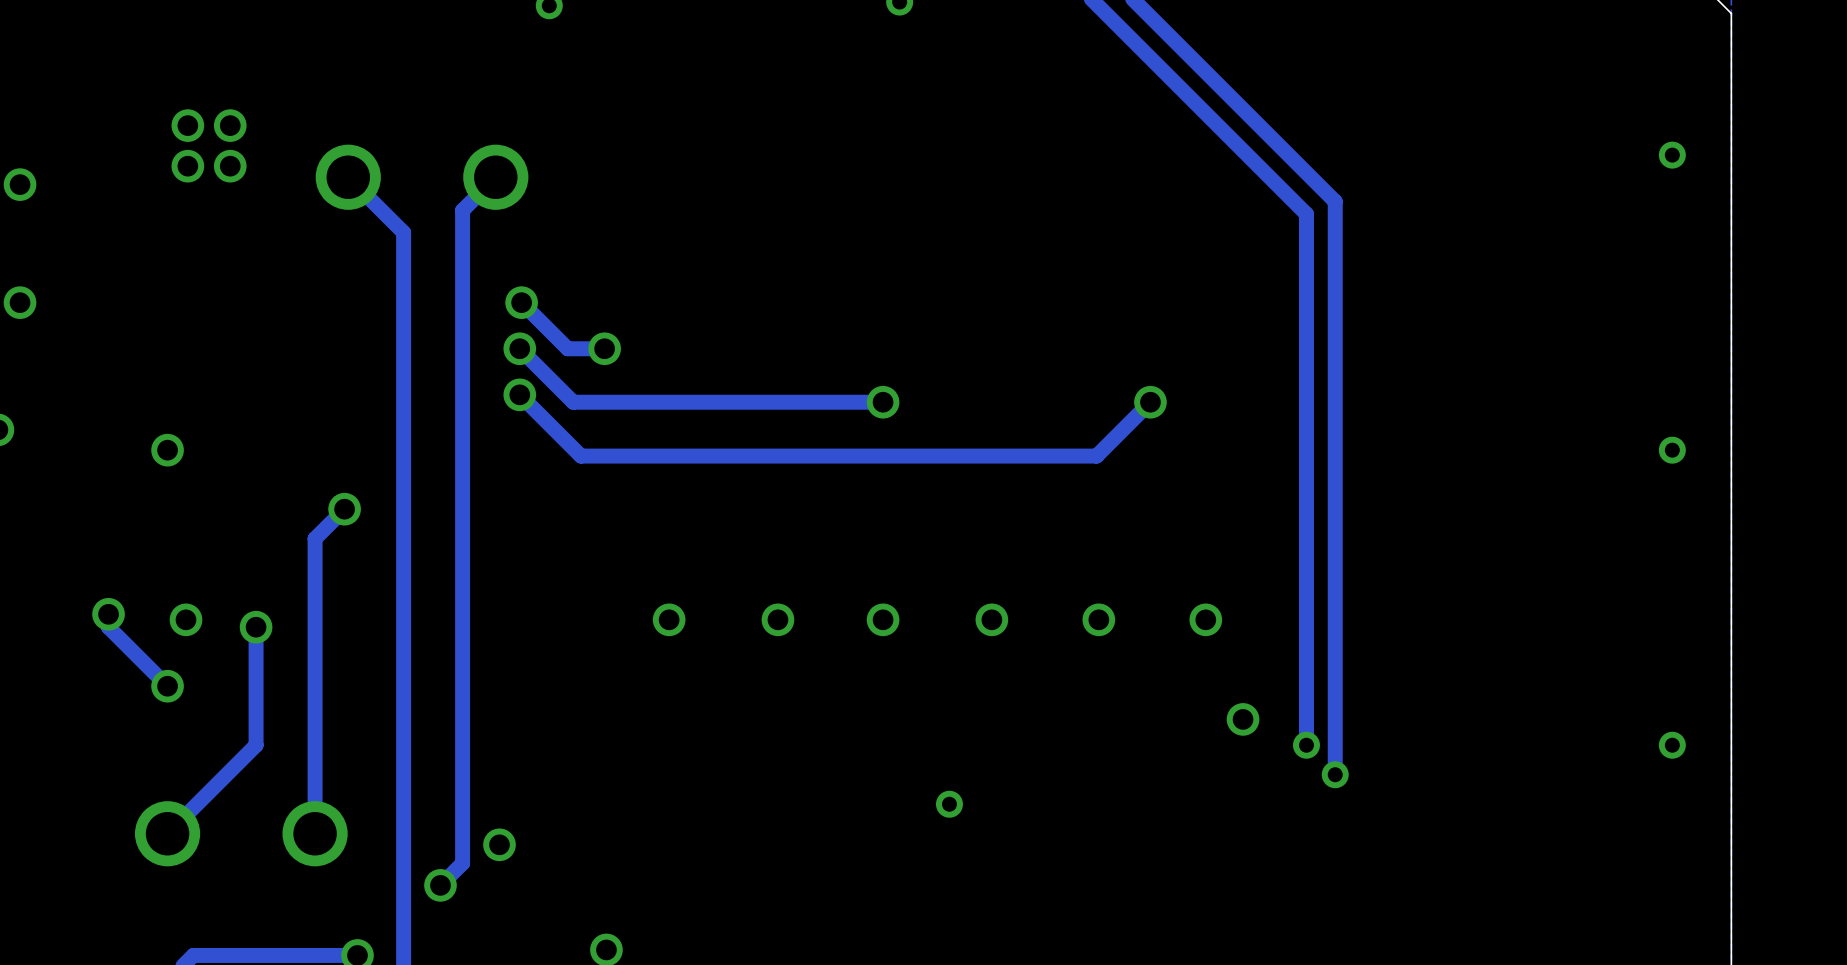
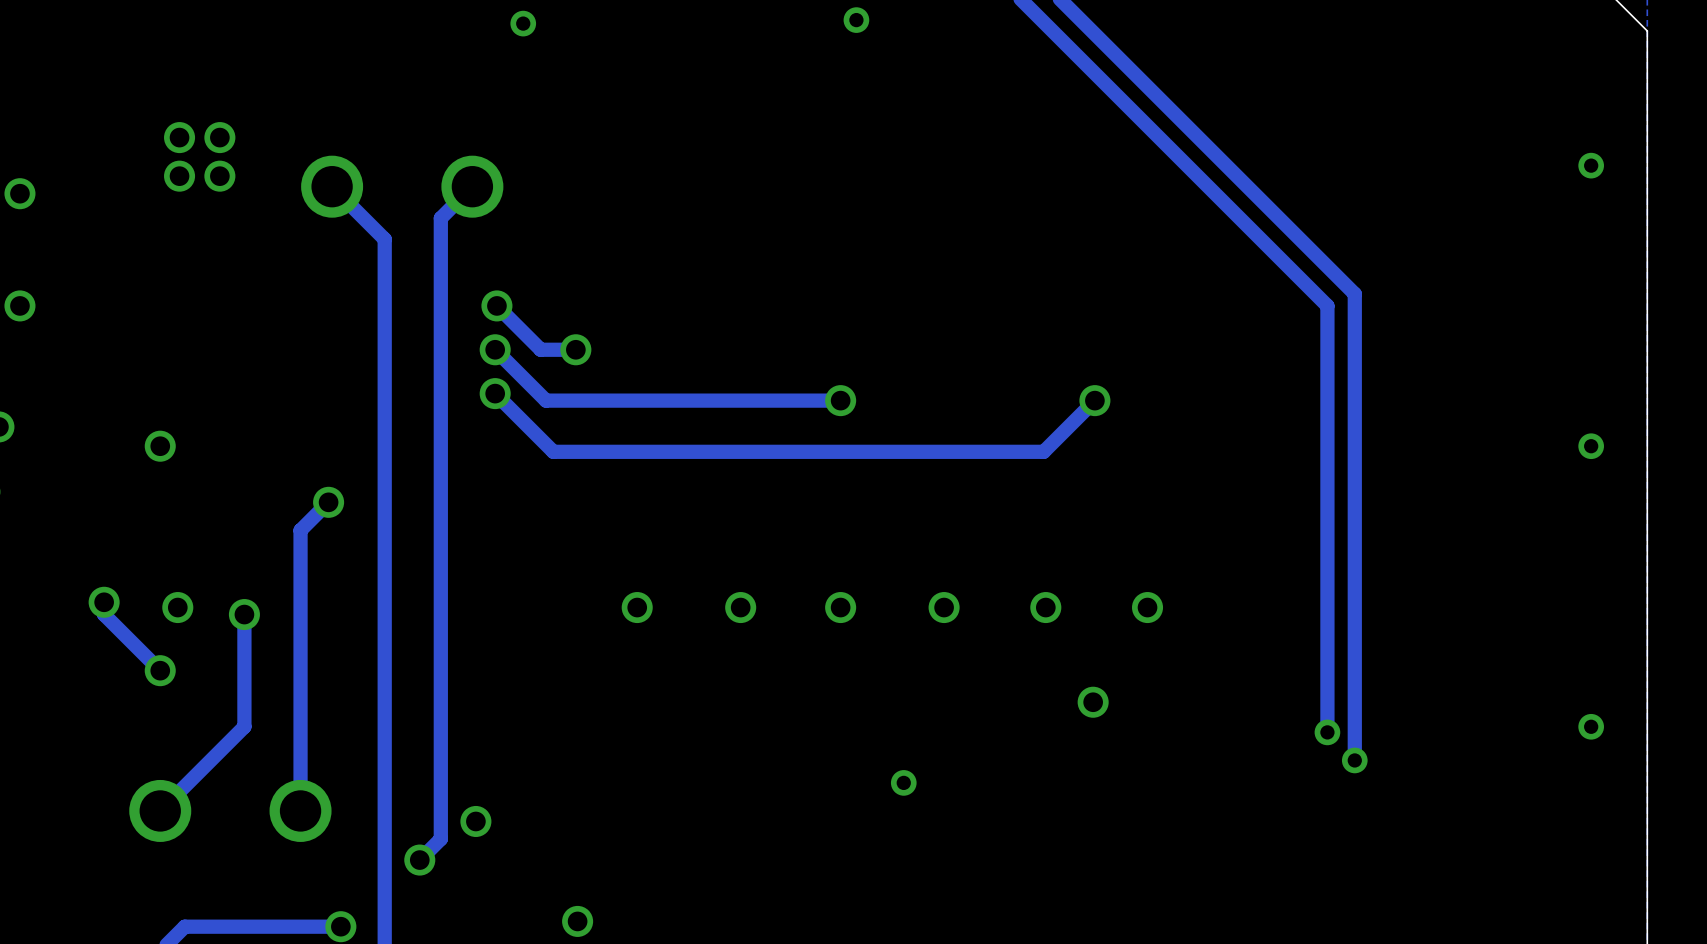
track: (1335, 201) (1335, 774) -> (1270, 209) (1354, 294) (1354, 760)
track: (1306, 214) (1306, 745) -> (1243, 221) (1327, 305) (1327, 732)
via position: (1243, 719) -> (1093, 702)
via: (1306, 745) -> none
via: none -> (1327, 732)
via: (1335, 774) -> none
via: none -> (1354, 760)

